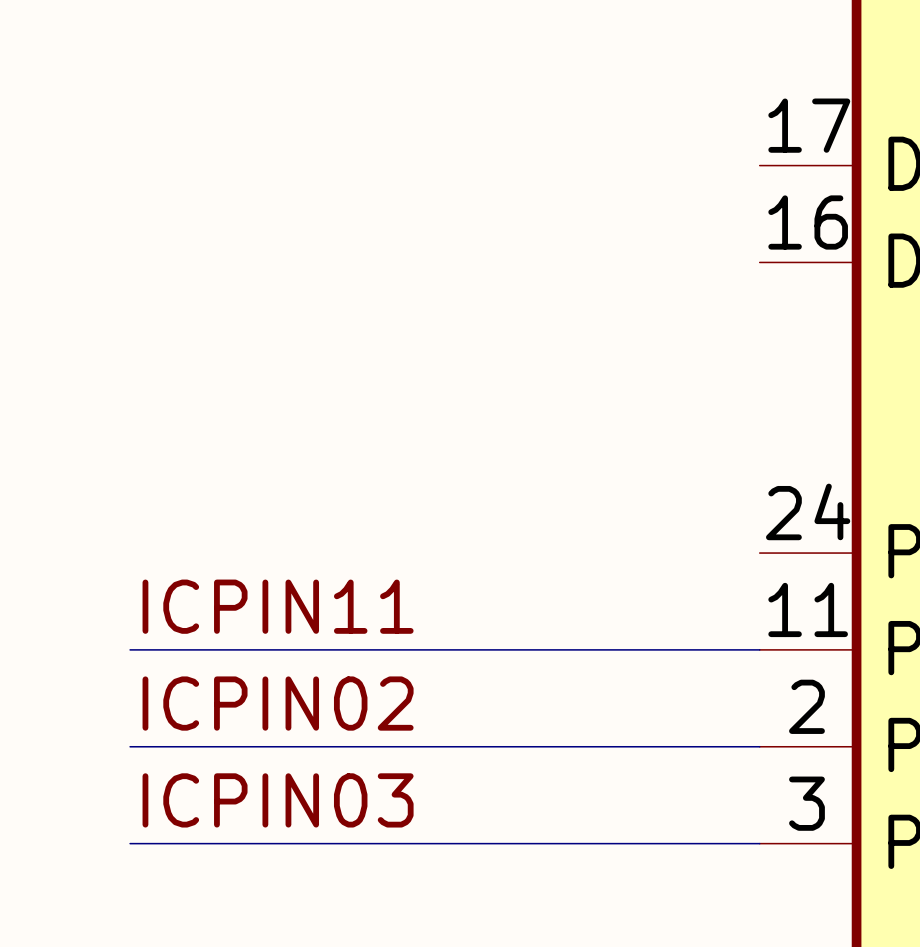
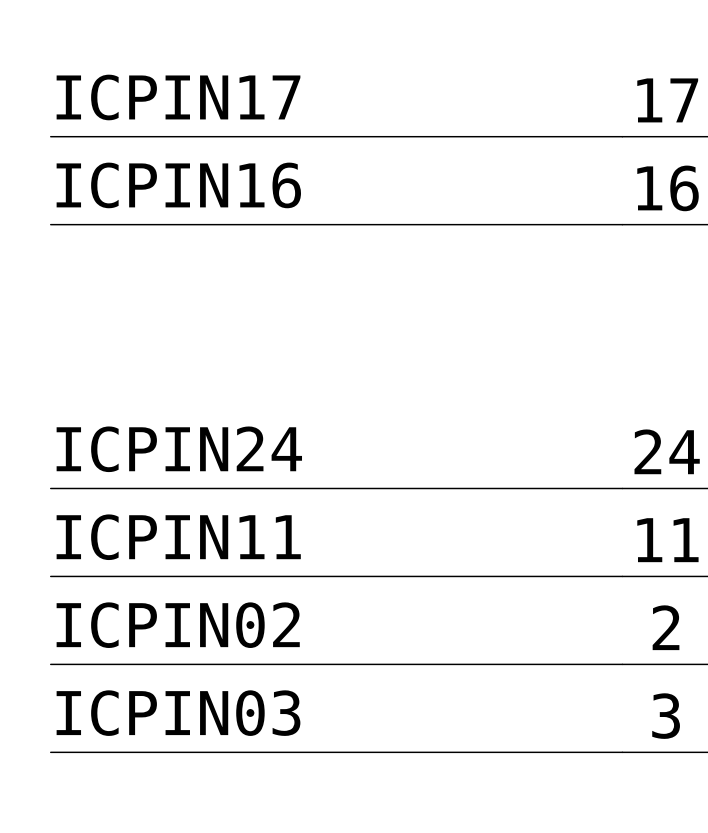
label: none -> ICPIN17 (178, 97)
wire: none -> (50, 136) (622, 136)
label: none -> ICPIN16 (178, 185)
wire: none -> (50, 224) (622, 224)
label: none -> ICPIN24 (179, 449)
wire: none -> (50, 488) (622, 488)

